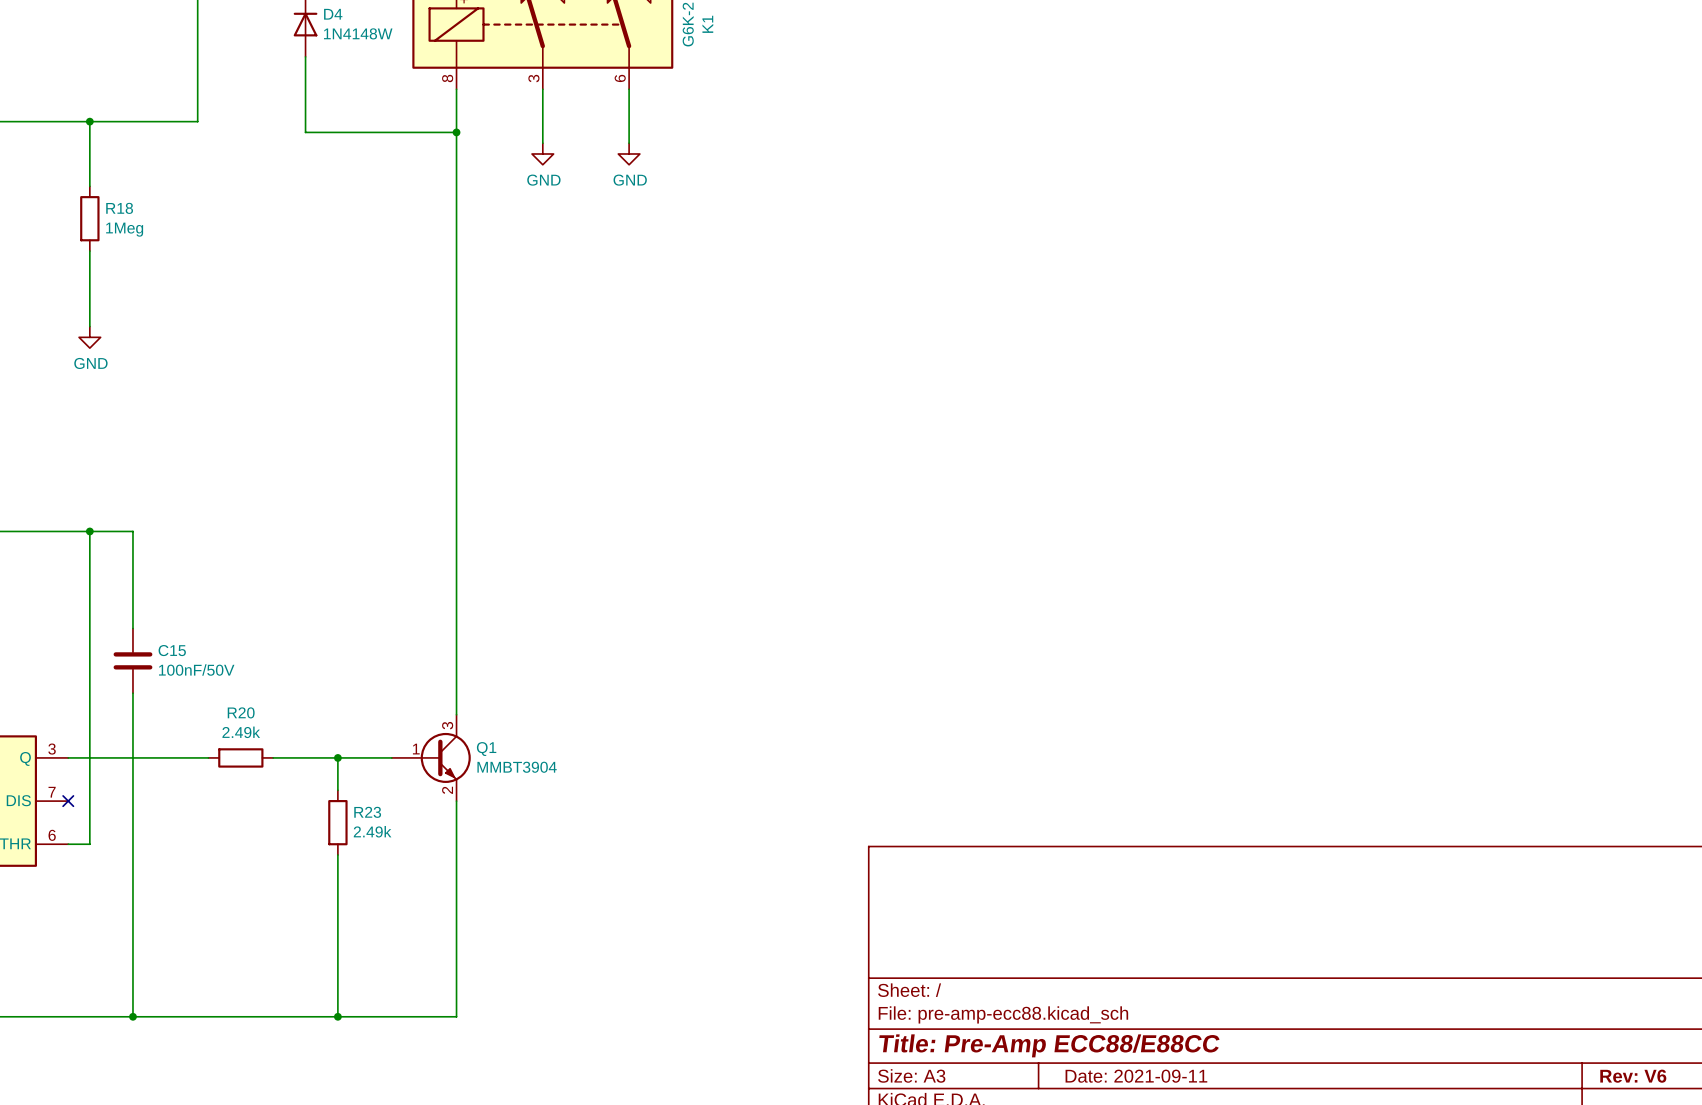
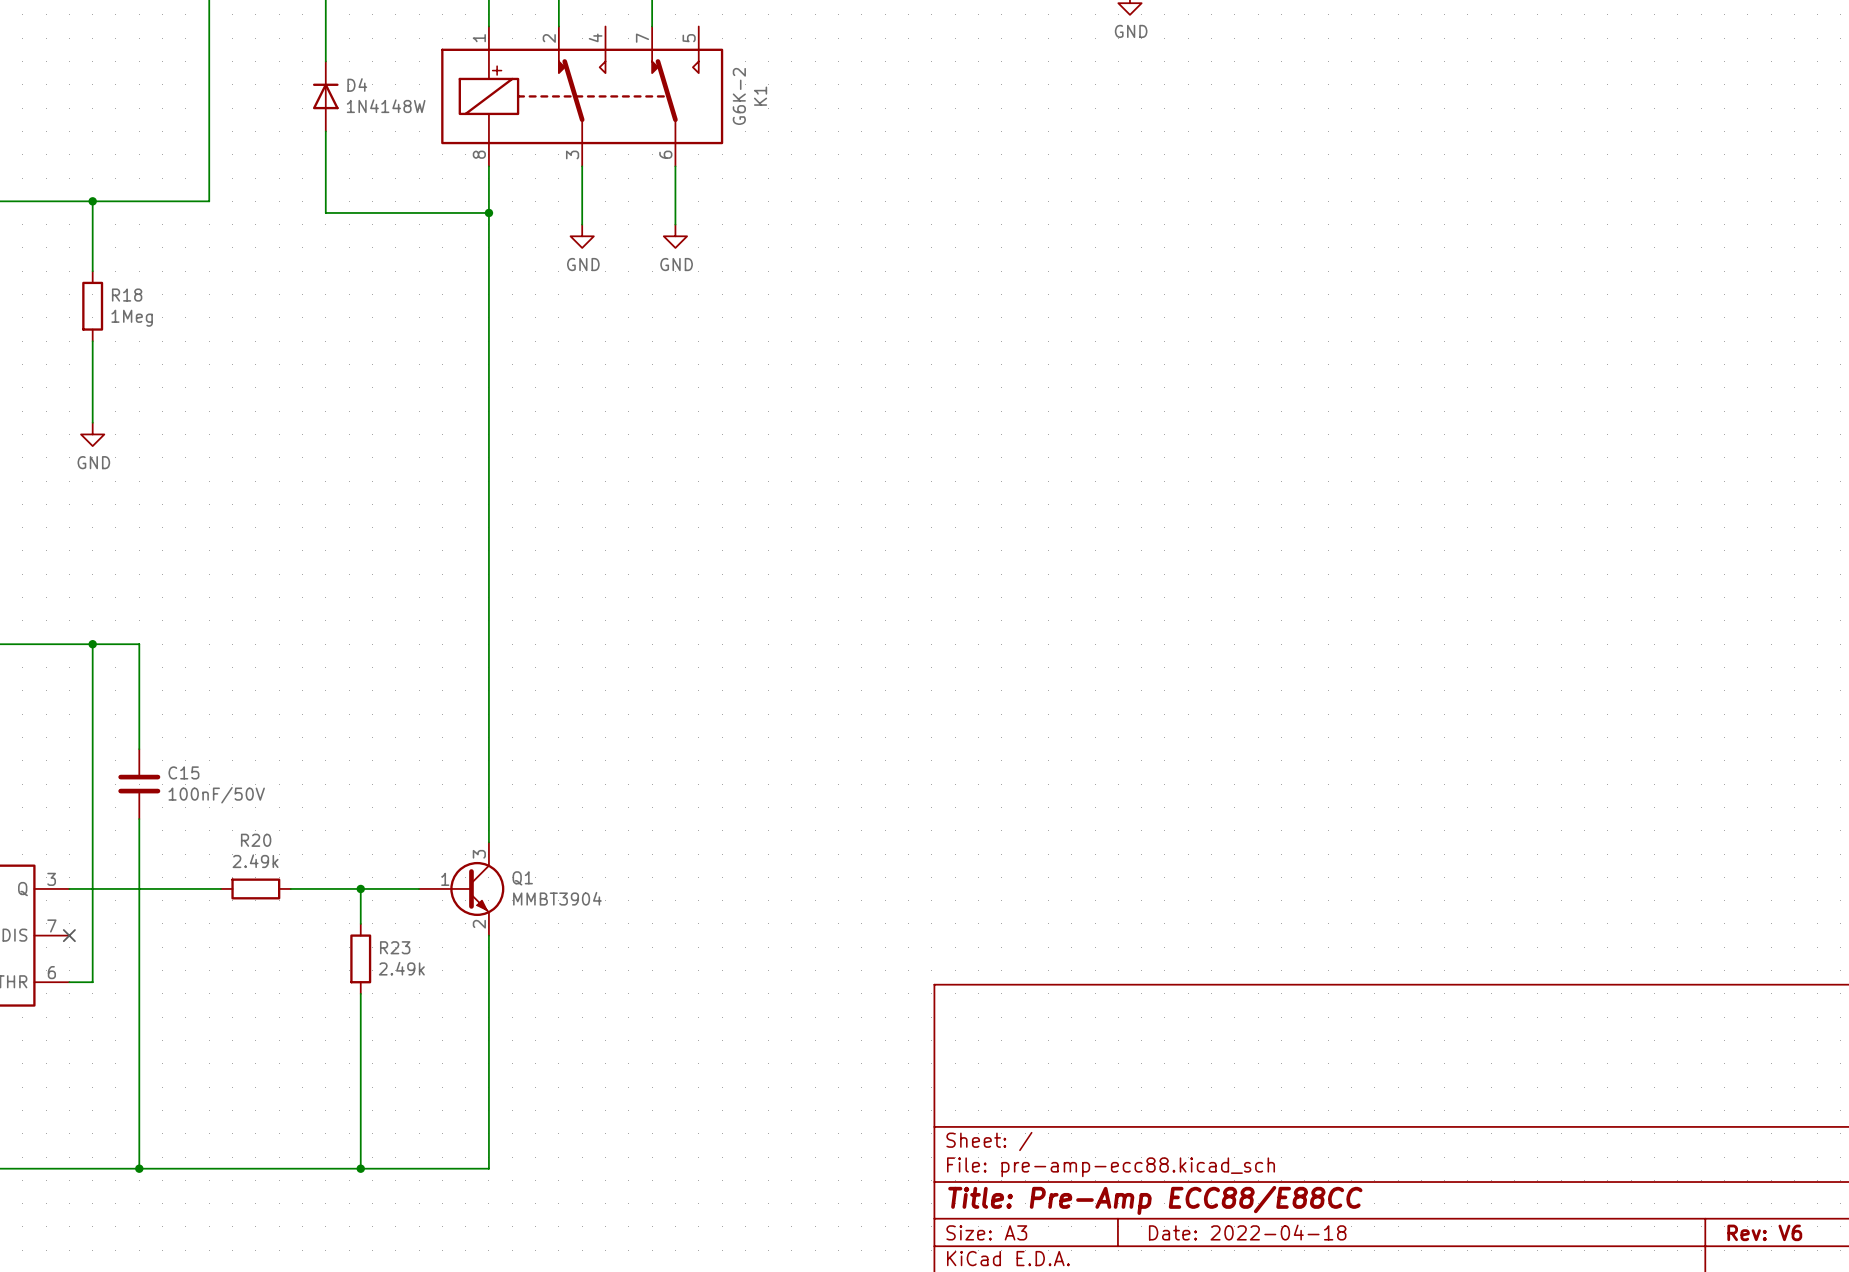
title block: Date: 2021-09-11 (1136, 1076) -> Date: 2022-04-18 (1247, 1232)

